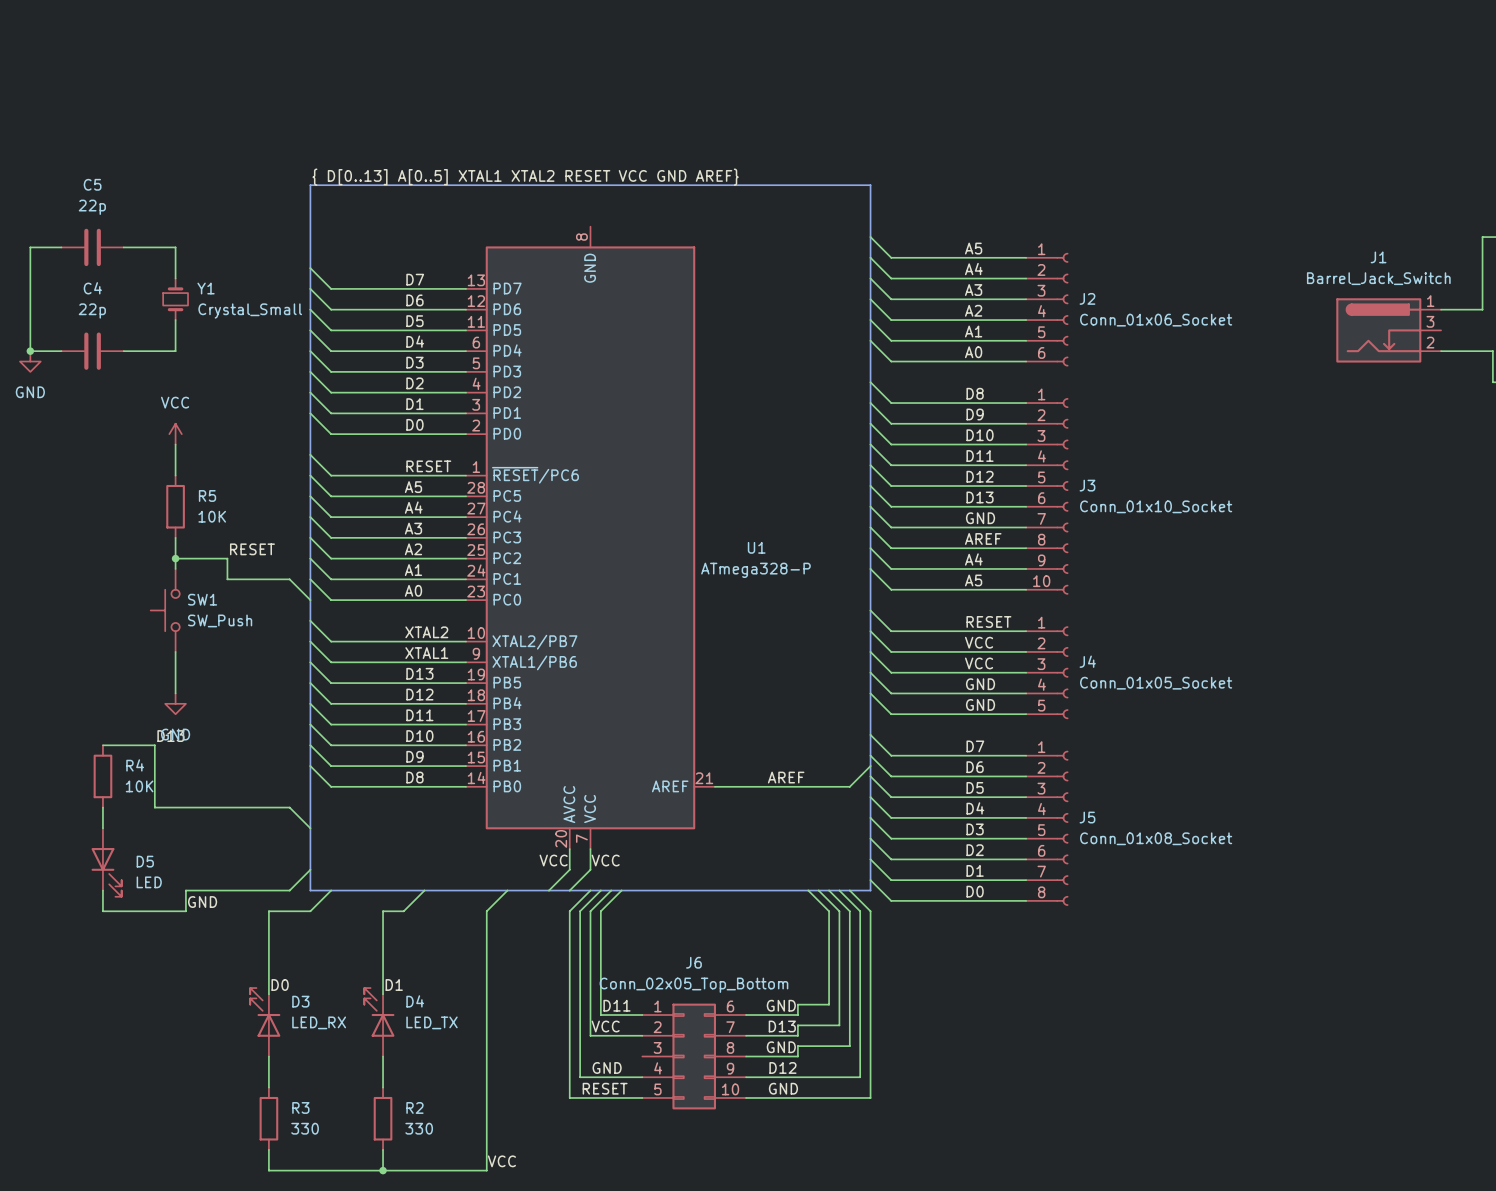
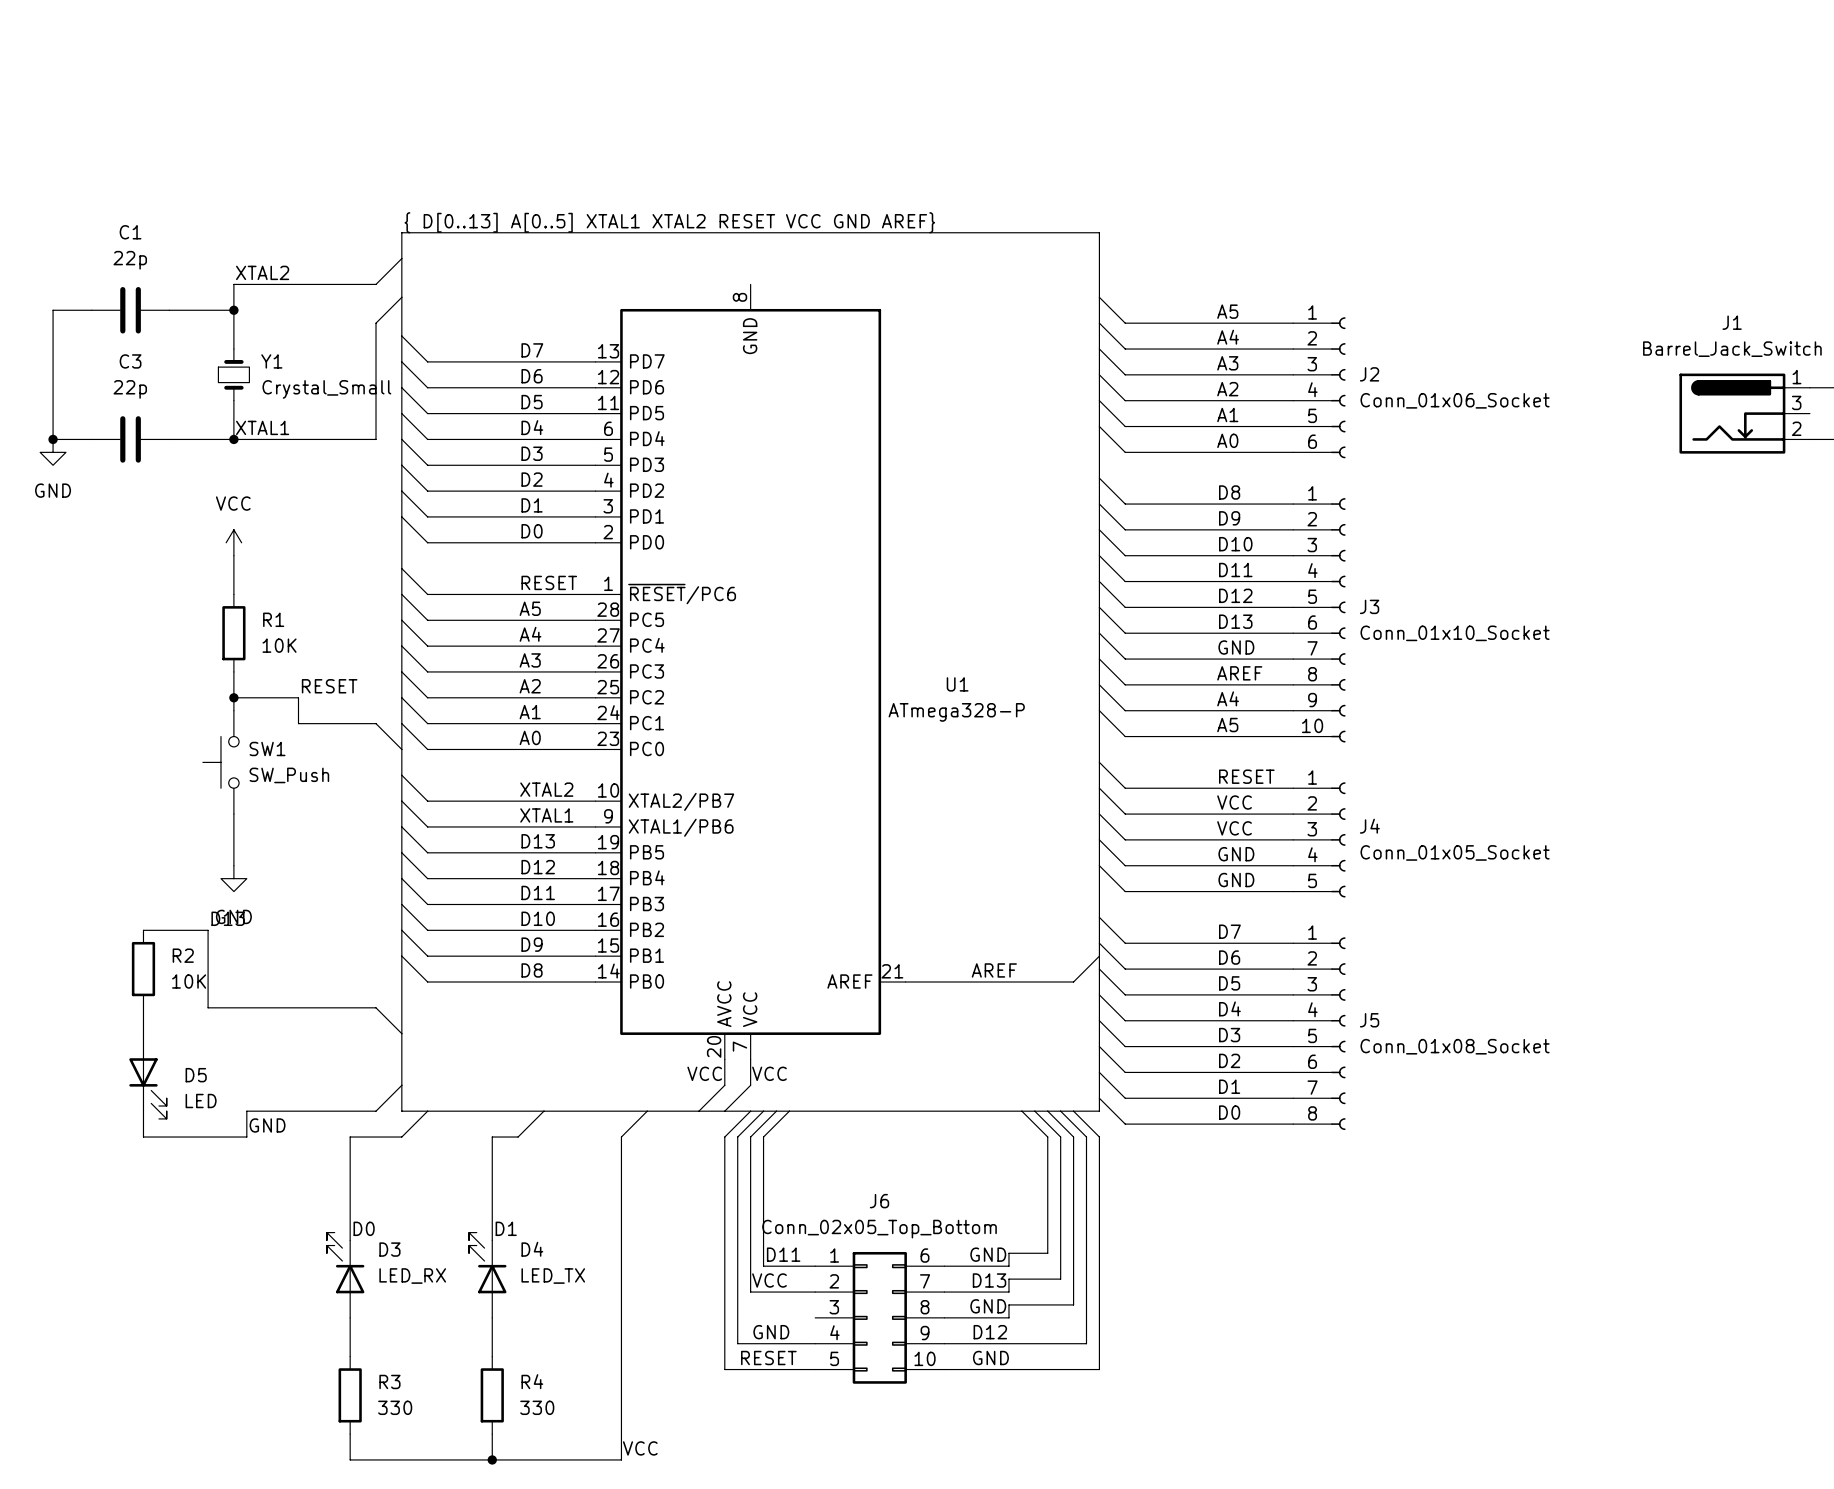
C5 name: C5 (92, 184) -> C1 (130, 232)
wire: none -> (401, 258) (376, 284) (233, 284) (233, 310)
label: none -> XTAL2 (262, 272)
wire: none -> (401, 297) (376, 323) (376, 439) (233, 439)
junction: none -> (233, 310)
C4 name: C4 (92, 288) -> C3 (130, 361)
label: none -> XTAL1 (262, 427)
junction: none -> (233, 439)
R5 name: R5 (207, 495) -> R1 (273, 619)
R4 name: R4 (135, 765) -> R2 (183, 955)
R2 name: R2 (414, 1107) -> R4 (532, 1381)

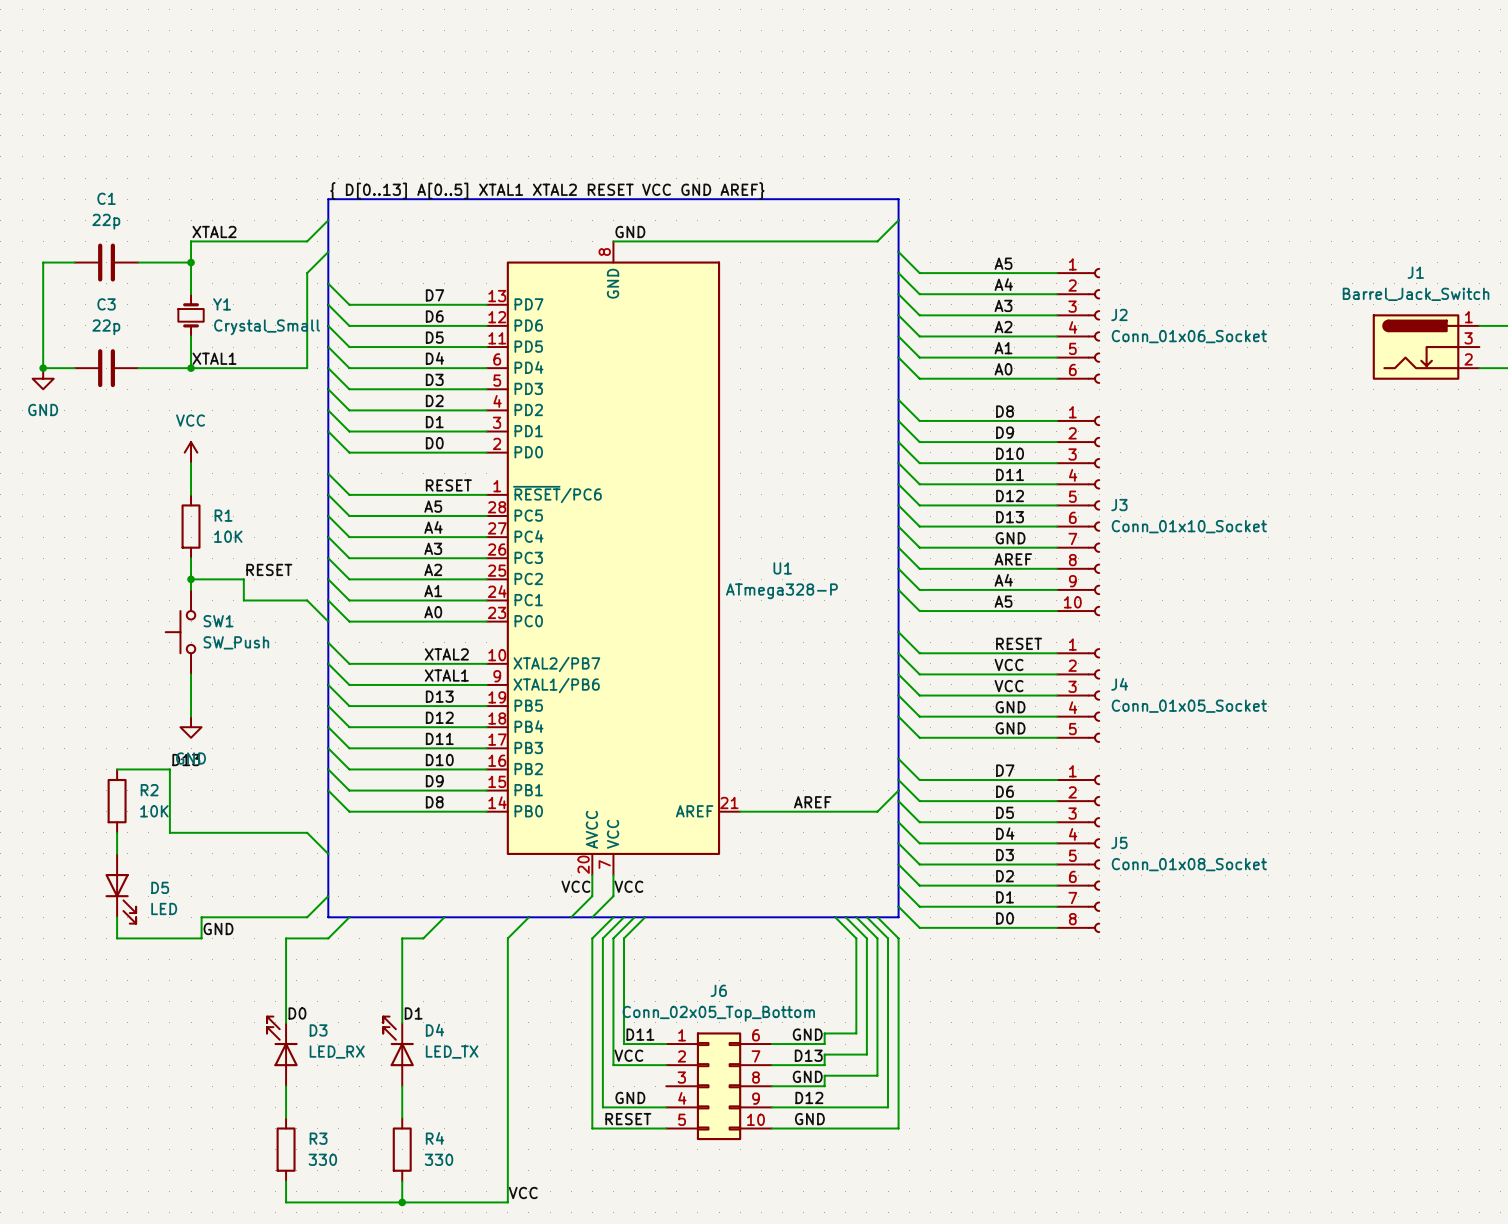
wire: none -> (898, 220) (877, 241) (613, 241)
label: none -> GND (630, 232)

